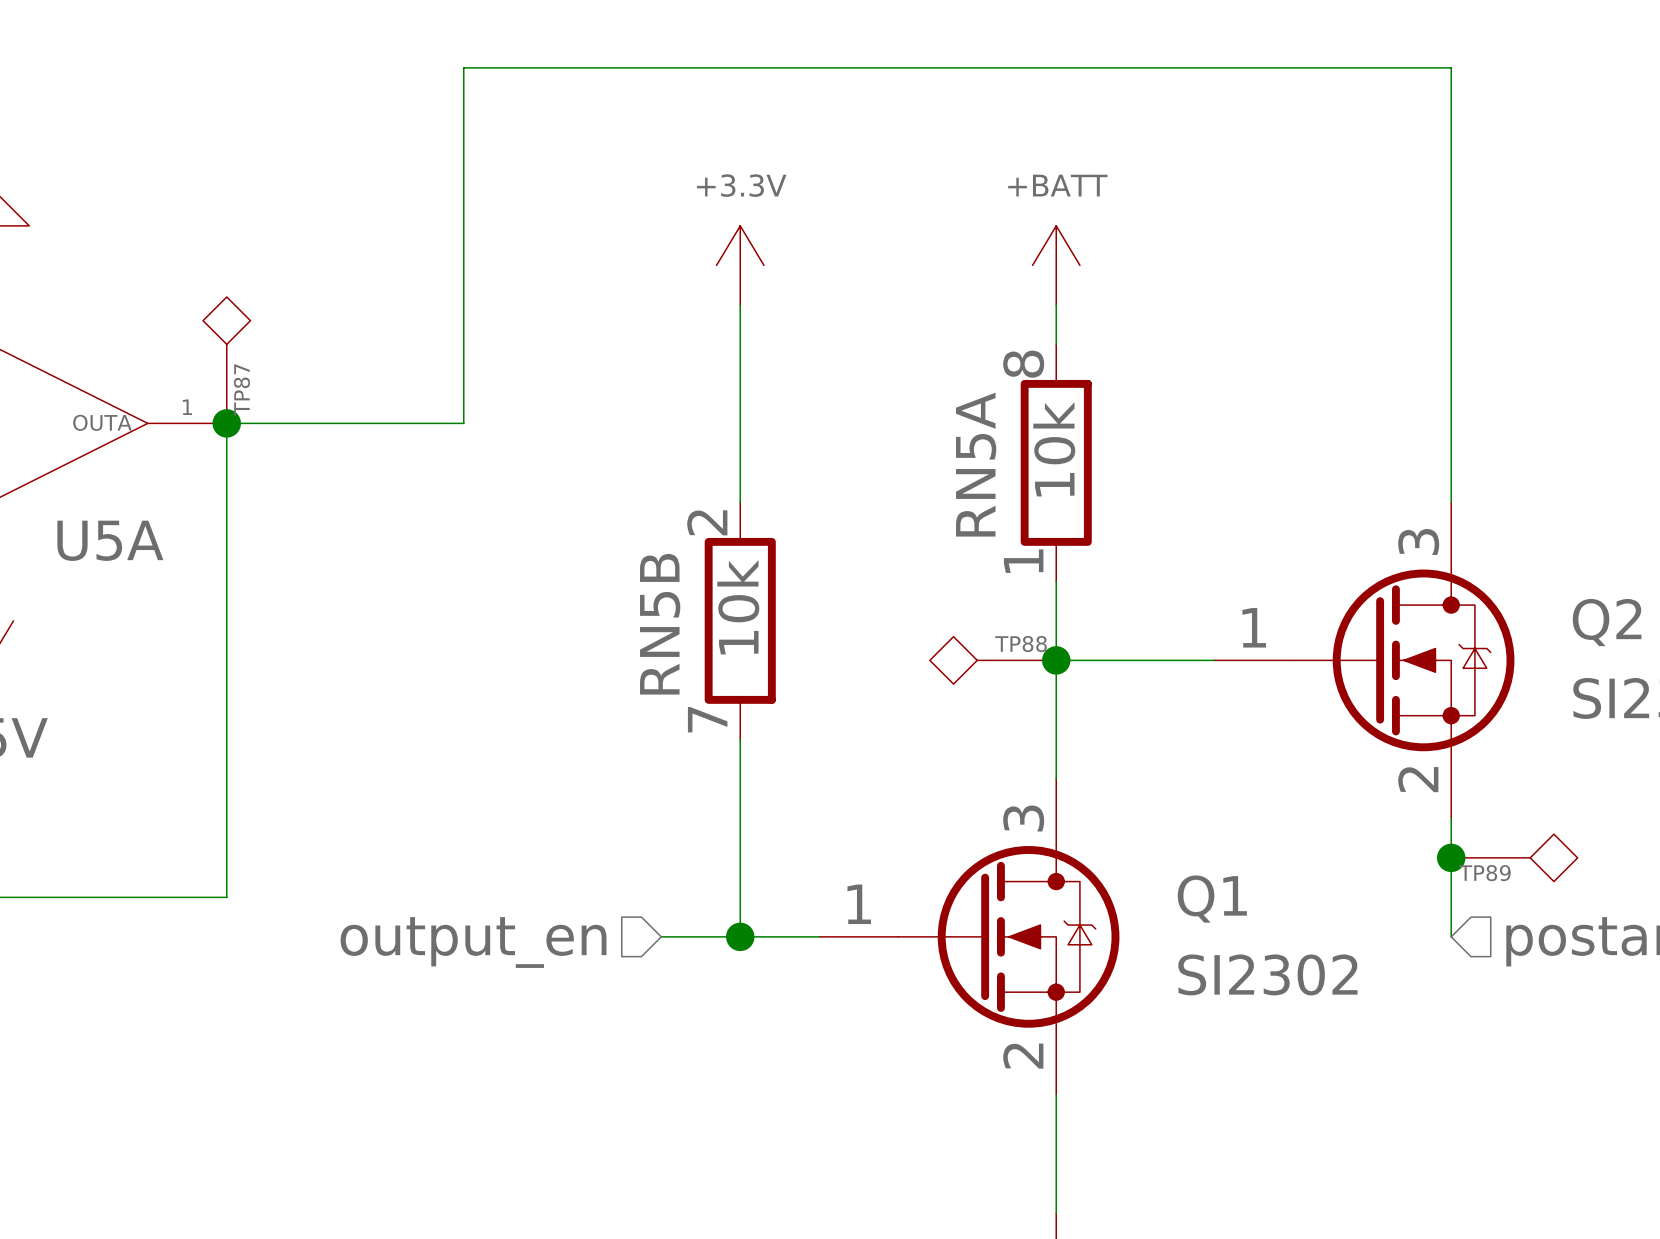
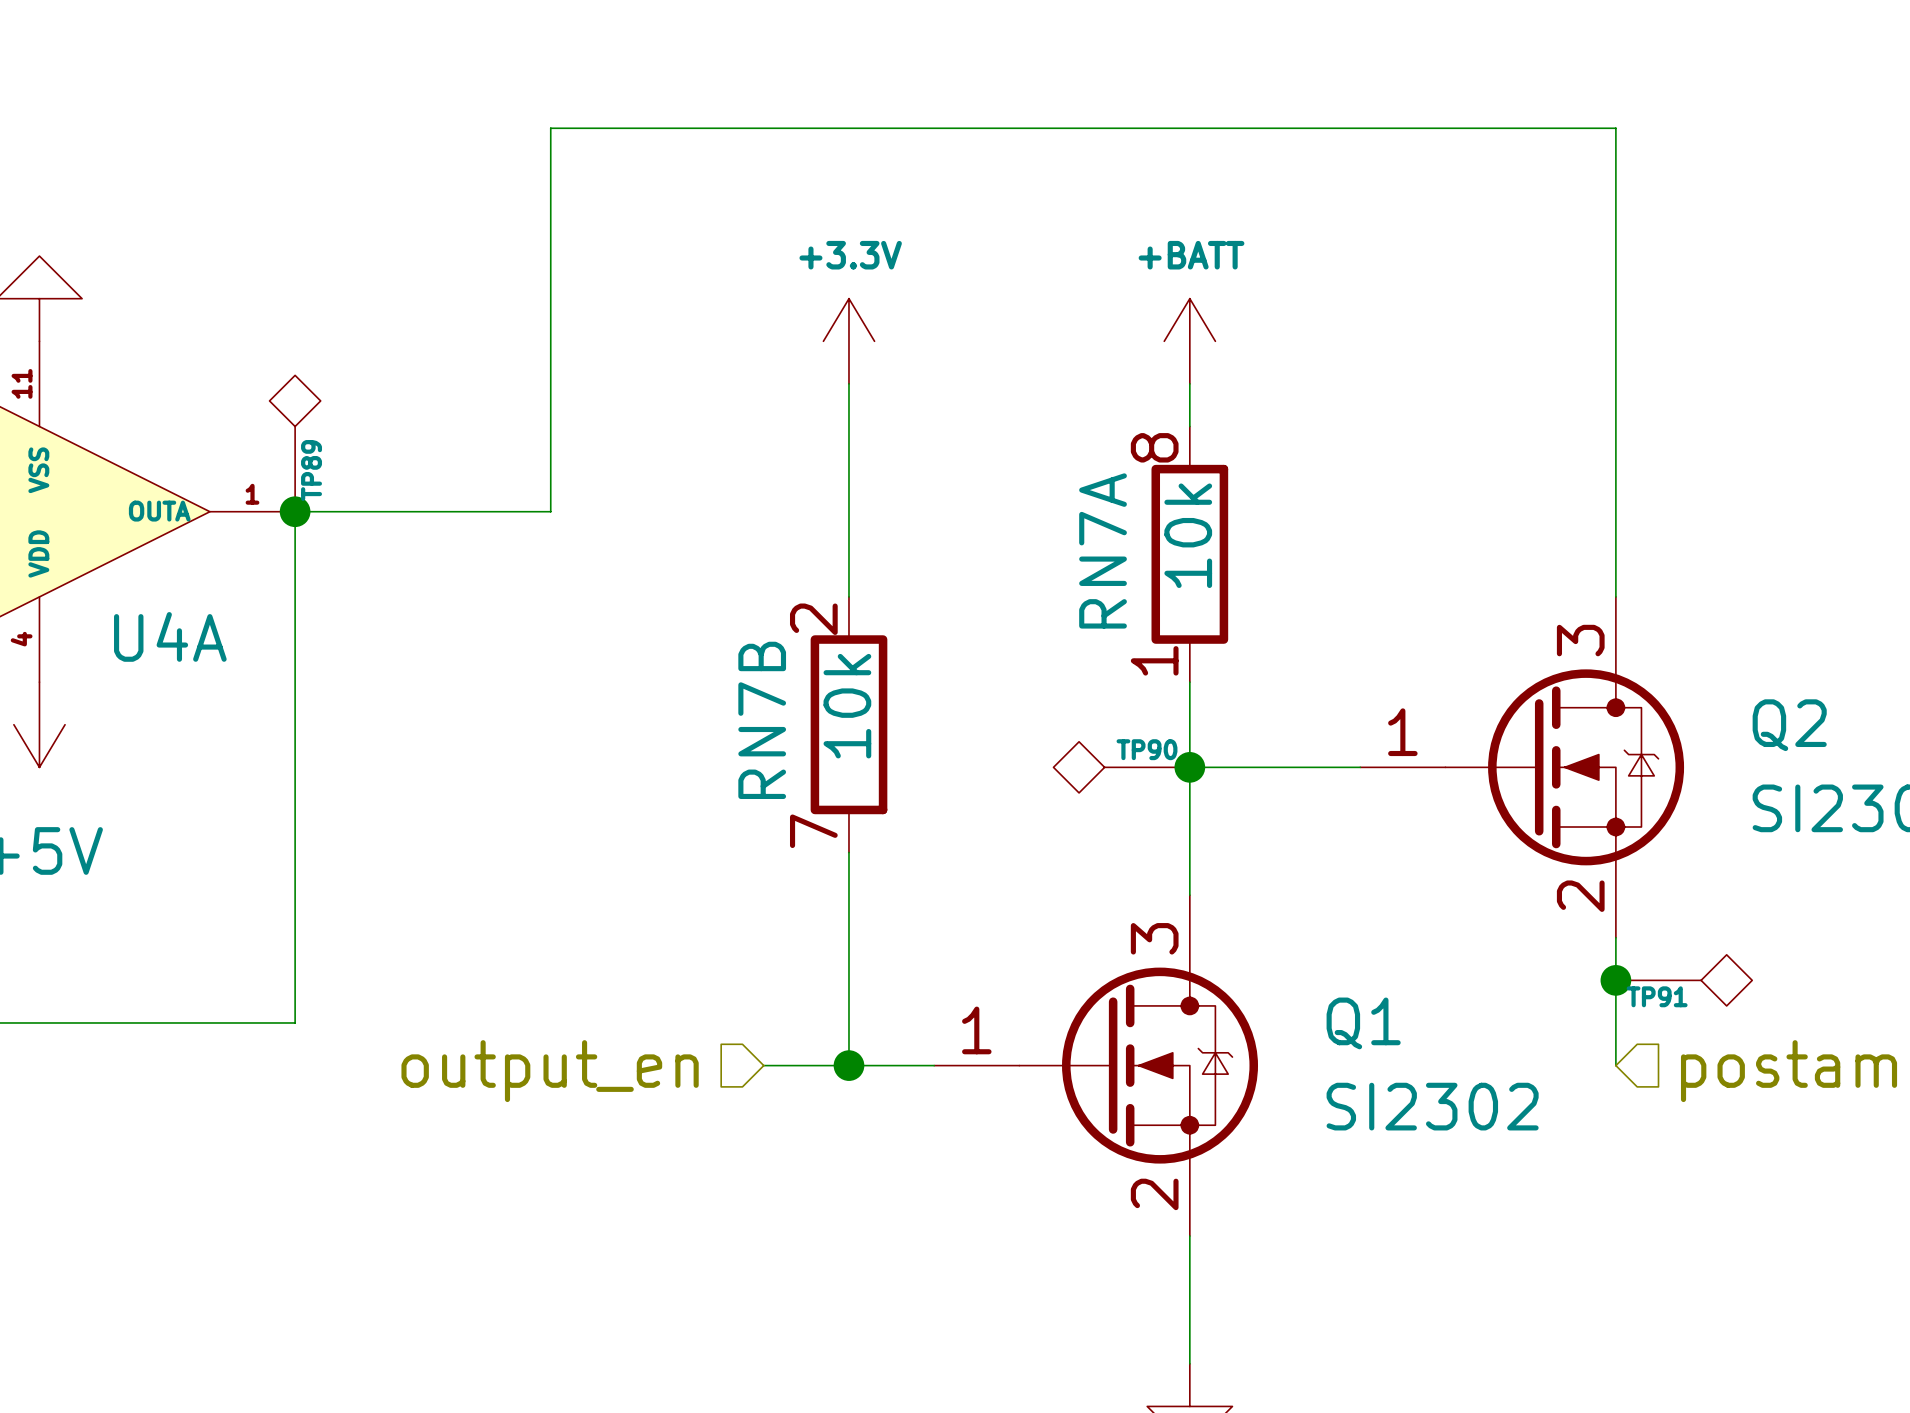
TP87 name: TP87 (241, 389) -> TP89 (311, 470)
RN5A name: RN5A (976, 464) -> RN7A (1103, 550)
U5A name: U5A (110, 540) -> U4A (170, 636)
RN5B name: RN5B (660, 624) -> RN7B (762, 720)
TP88 name: TP88 (1021, 644) -> TP90 (1147, 749)
TP89 name: TP89 (1484, 873) -> TP91 (1657, 996)

